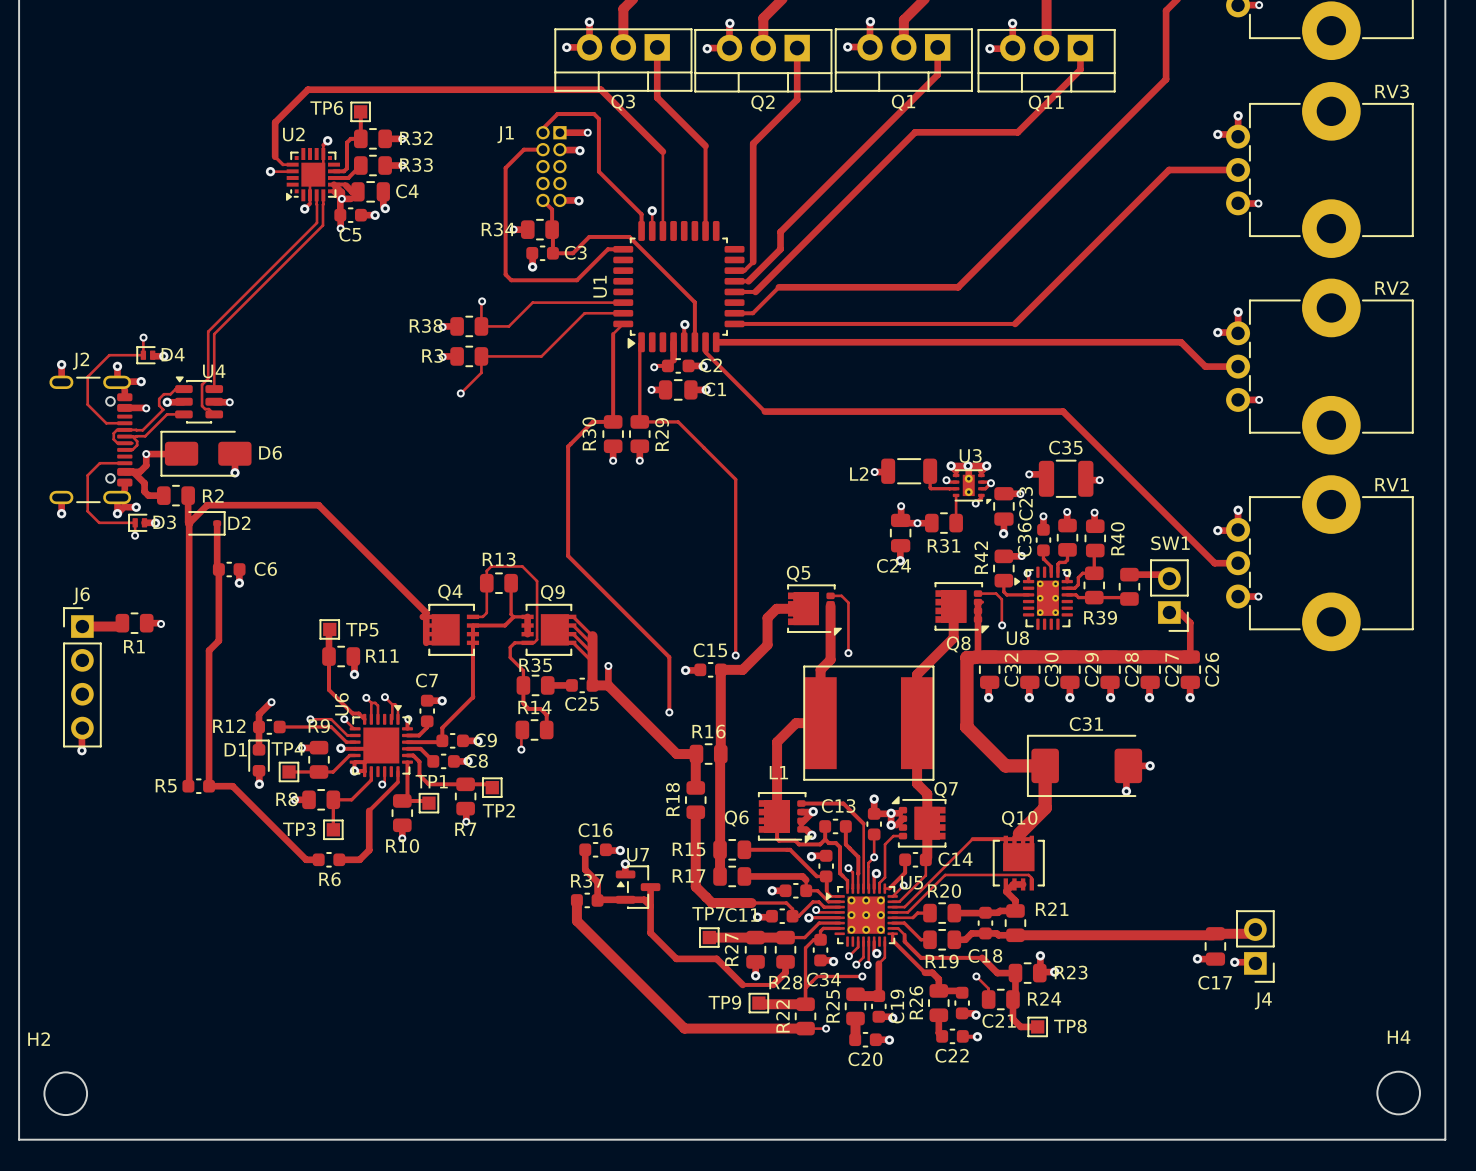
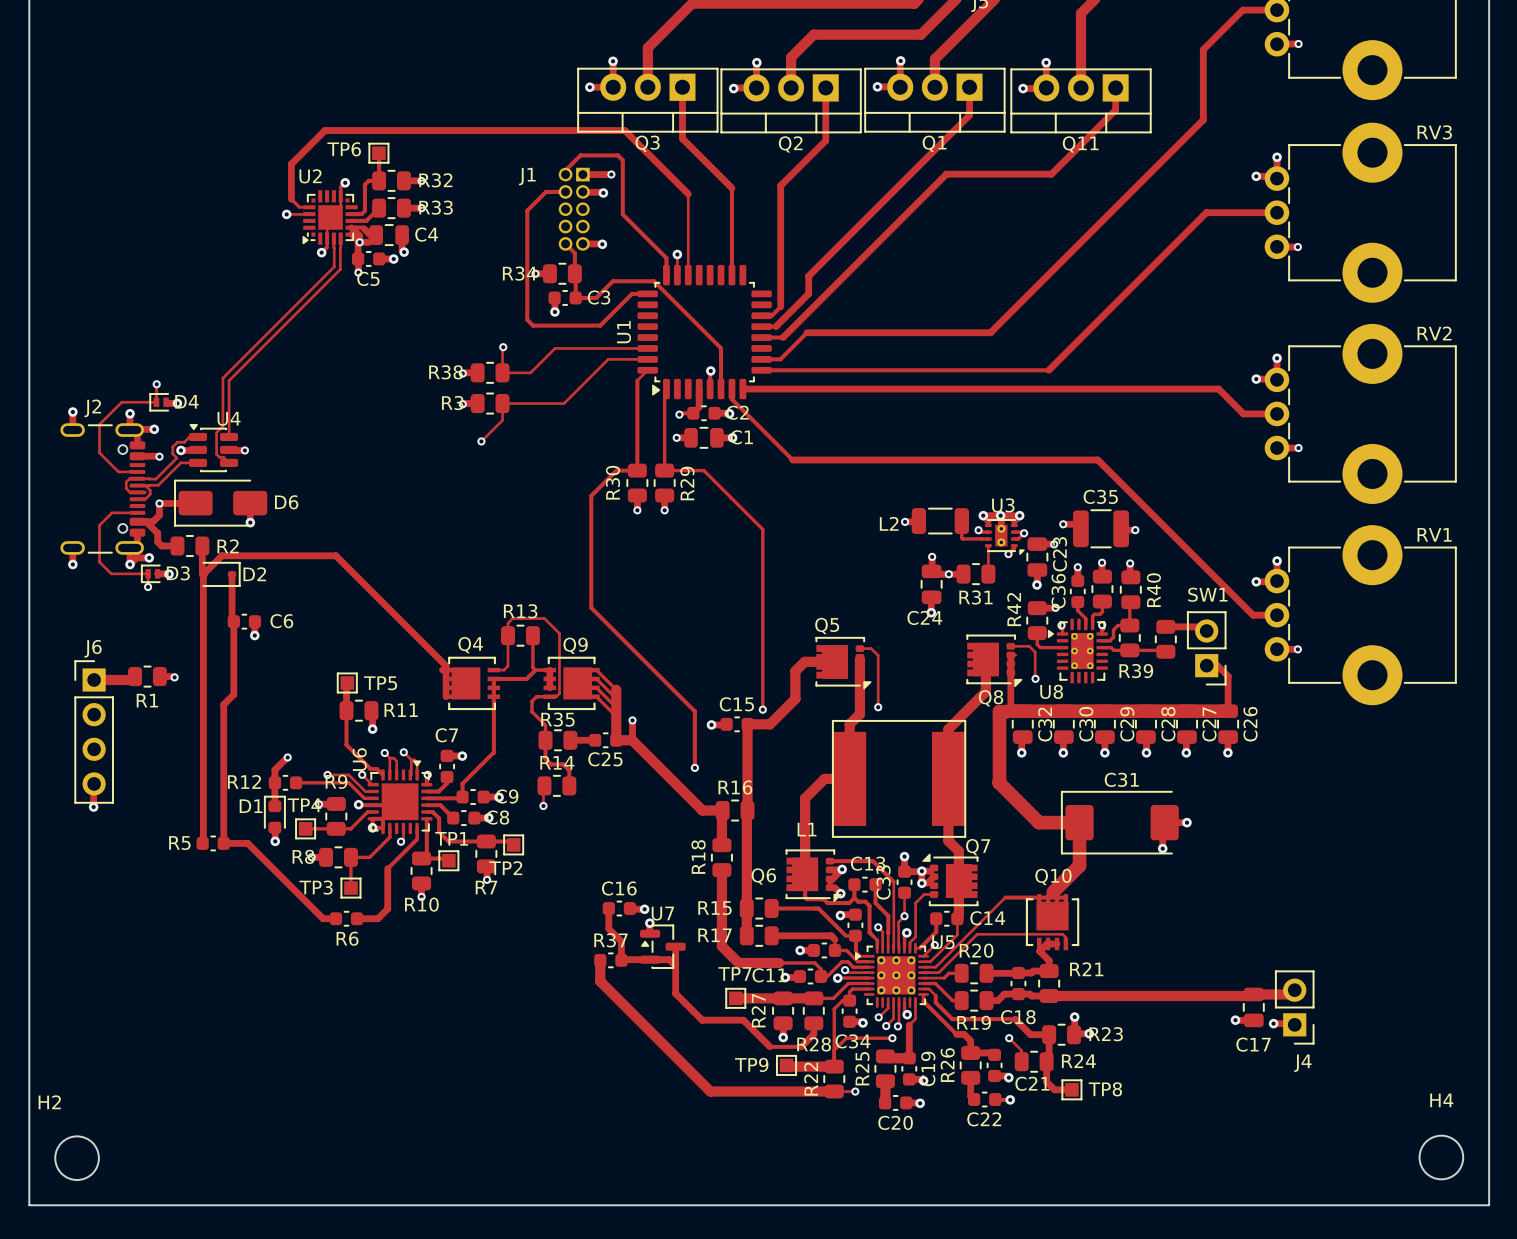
TP2 name position: TP2 (498, 810) -> TP2 (505, 868)
C33 name: none -> C33 (883, 882)

